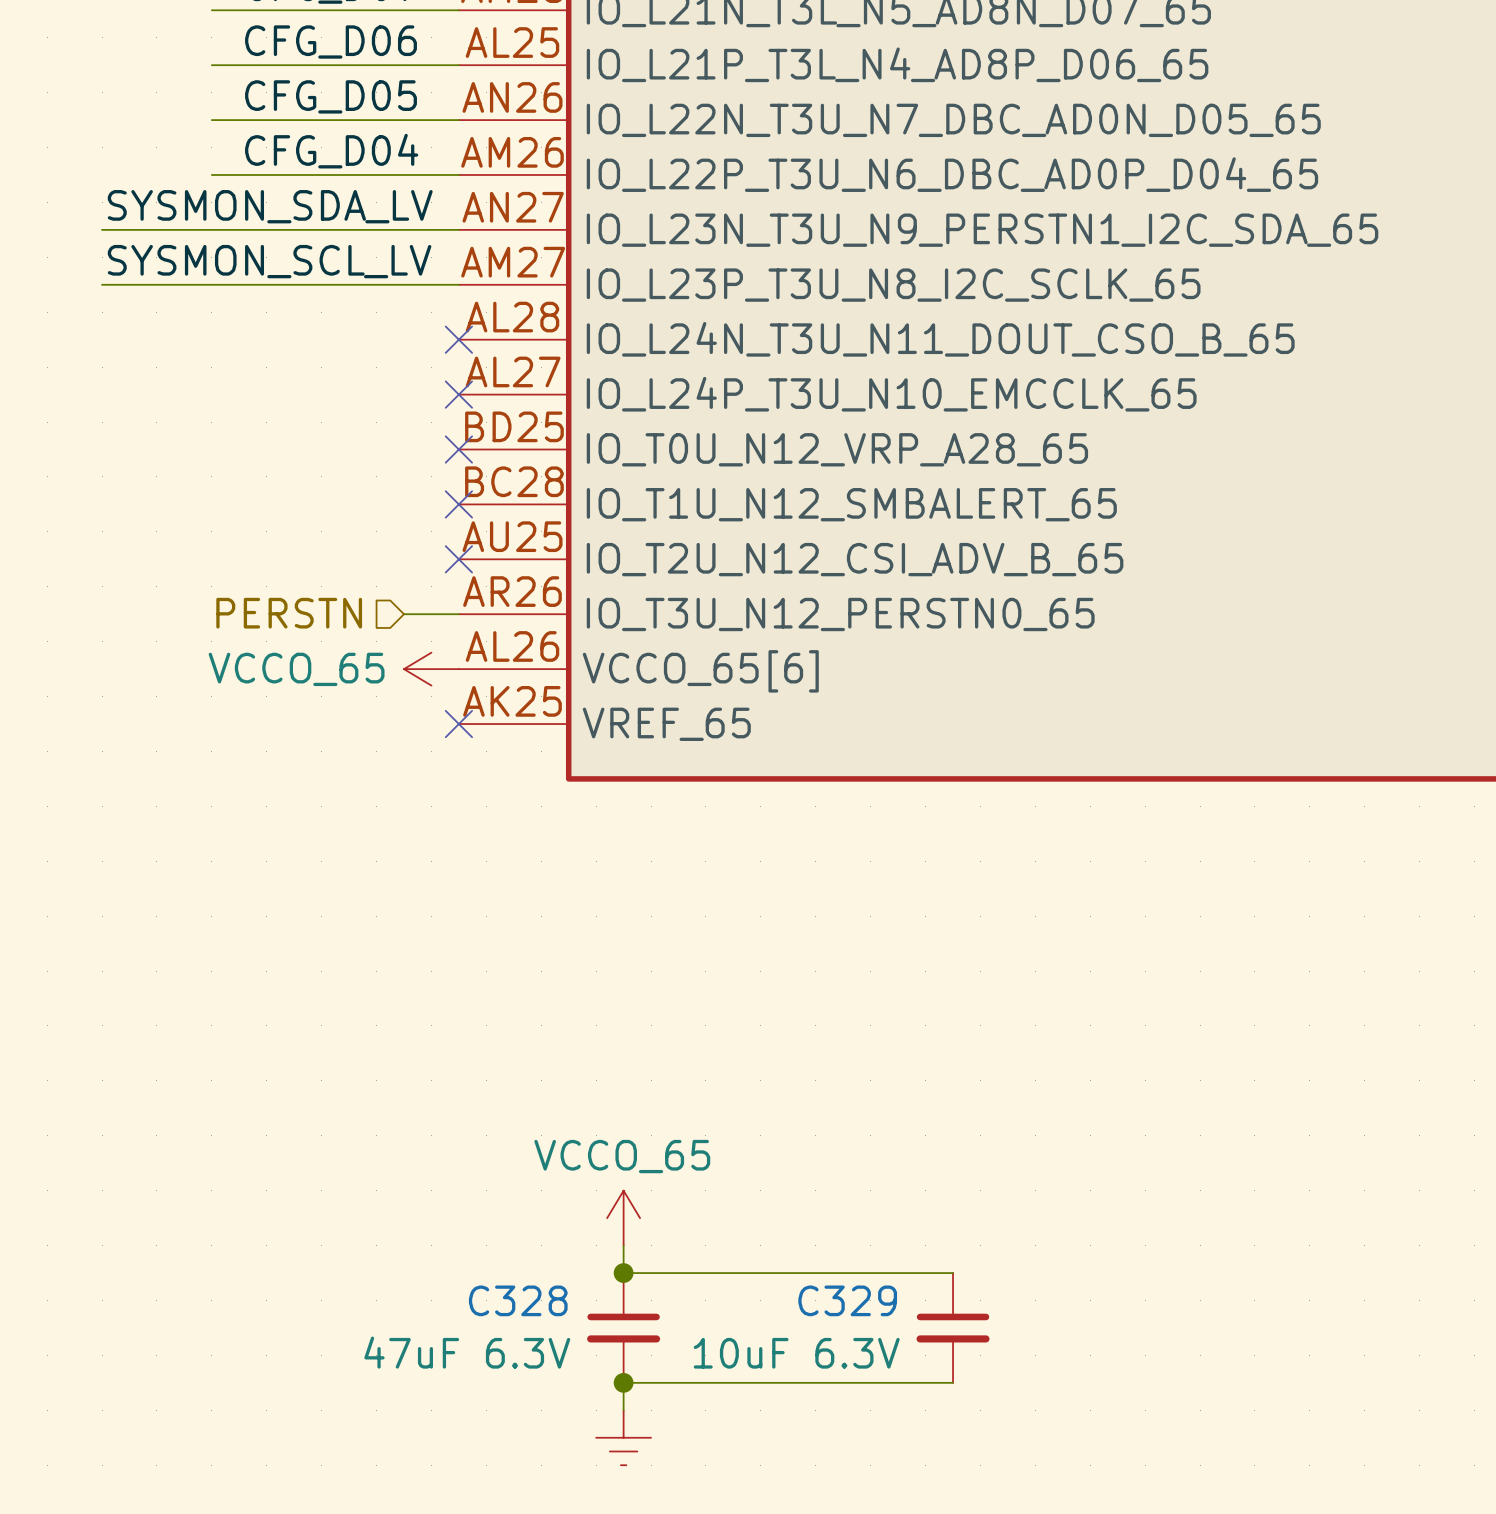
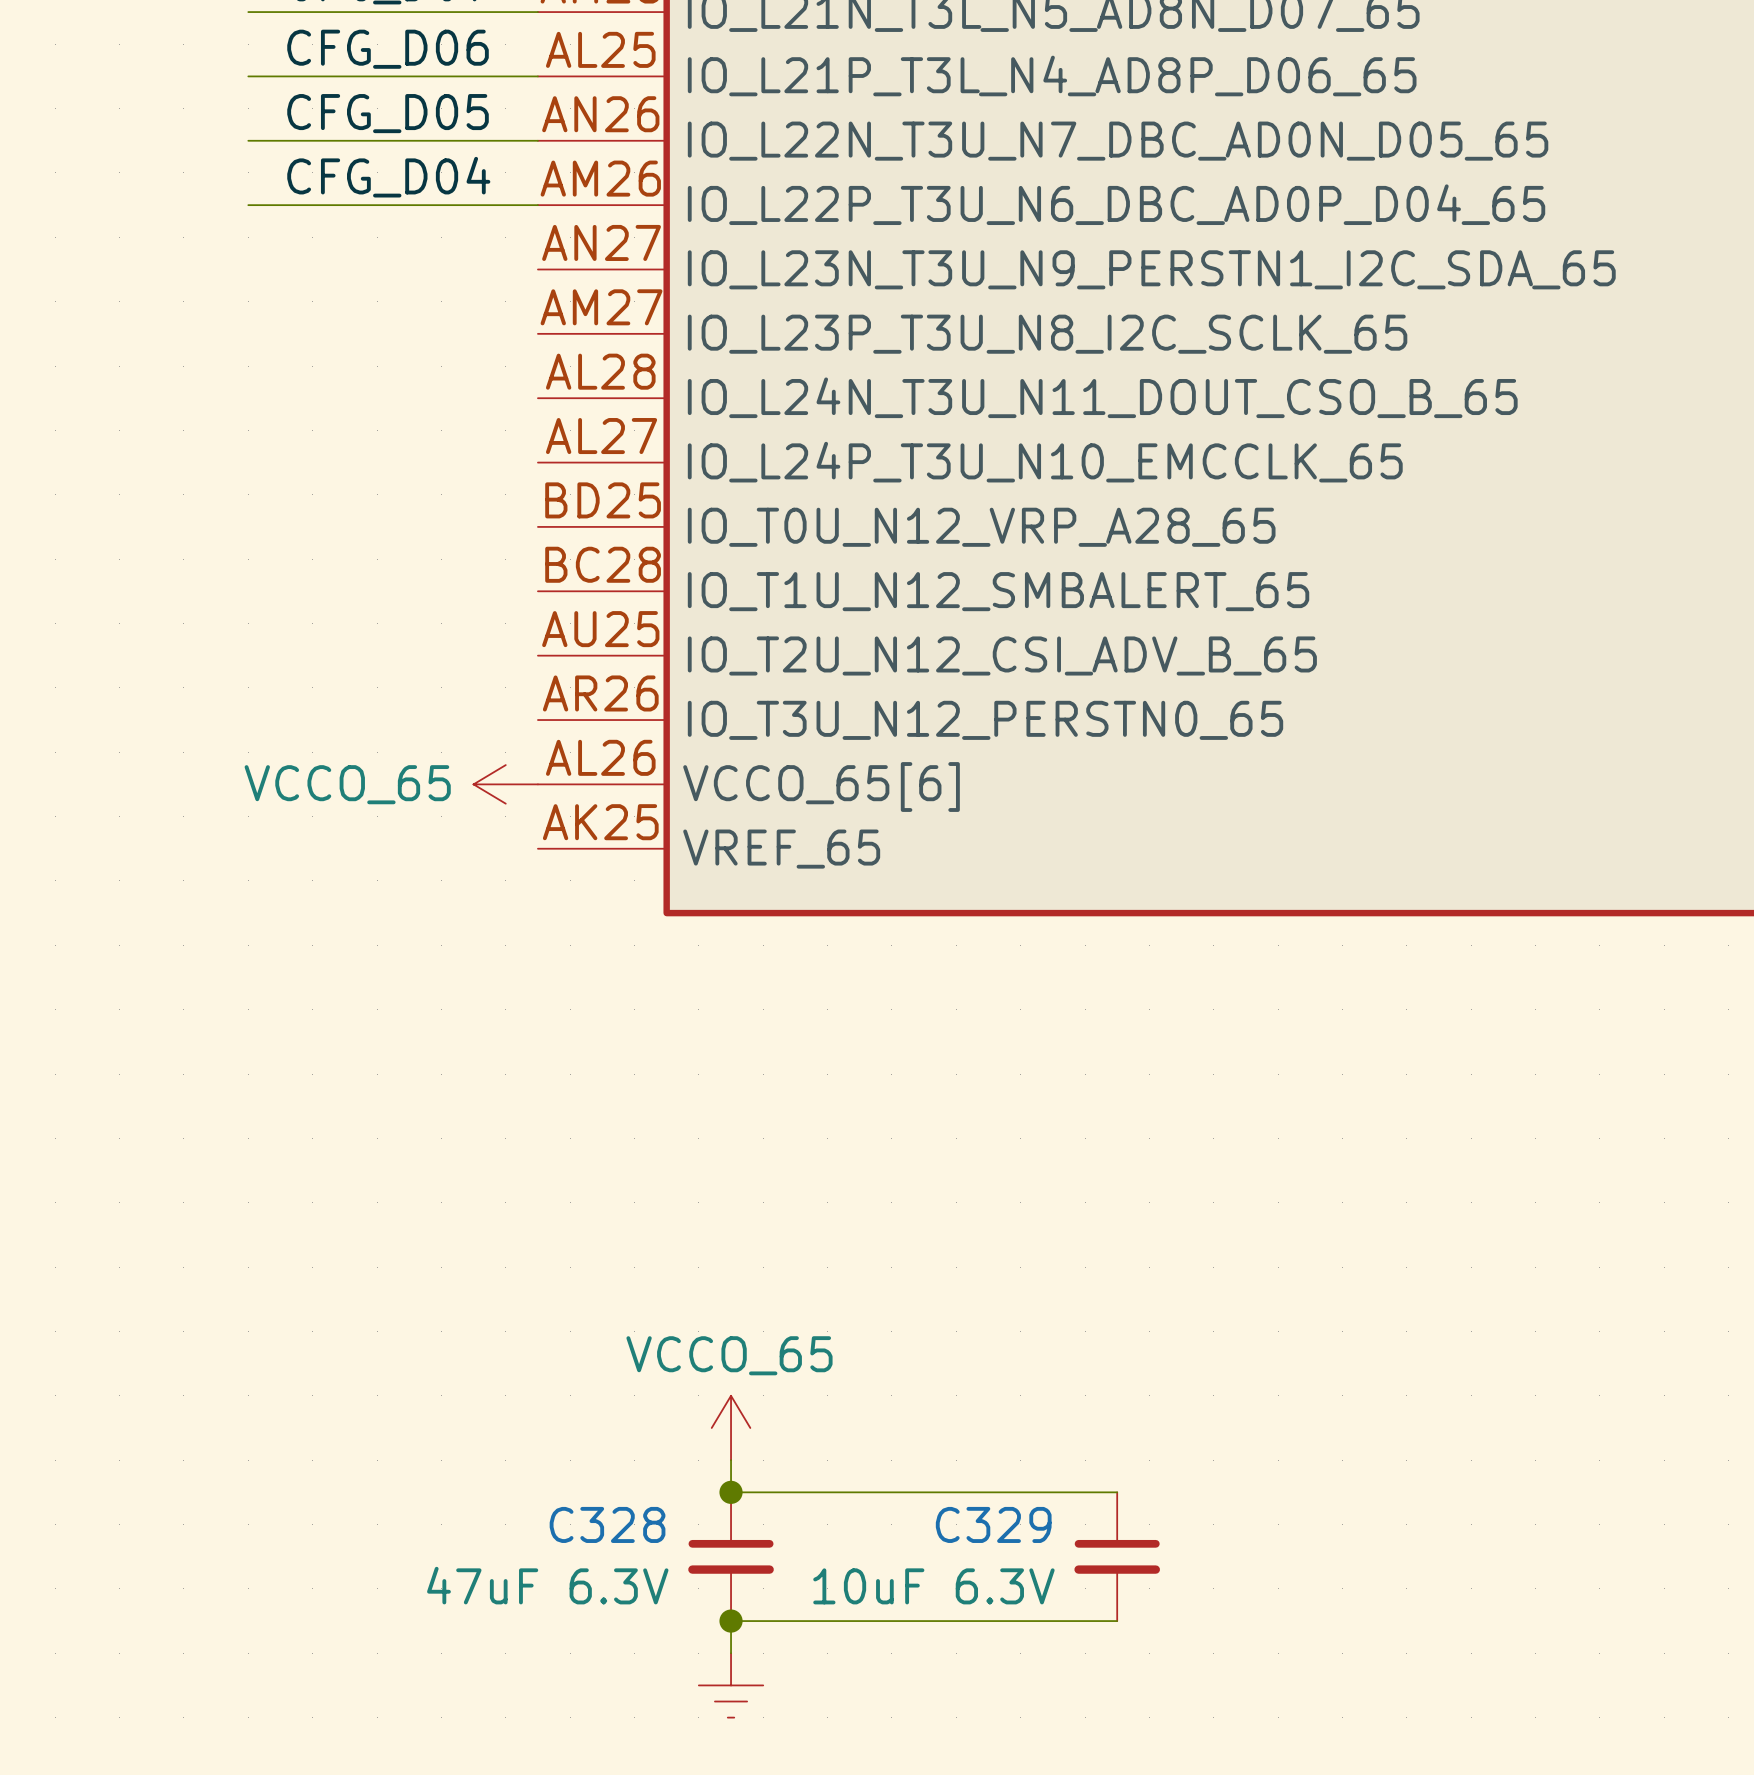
label: SYSMON_SDA_LV (270, 206) -> none
wire: (102, 229) (458, 229) -> none
label: SYSMON_SCL_LV (269, 261) -> none
wire: (102, 284) (458, 284) -> none
no-connect mark: (458, 339) -> none
no-connect mark: (458, 394) -> none
no-connect mark: (458, 449) -> none
no-connect mark: (458, 504) -> none
no-connect mark: (458, 559) -> none
hierarchical label: PERSTN (289, 613) -> none
wire: (403, 614) (458, 614) -> none
no-connect mark: (458, 724) -> none

